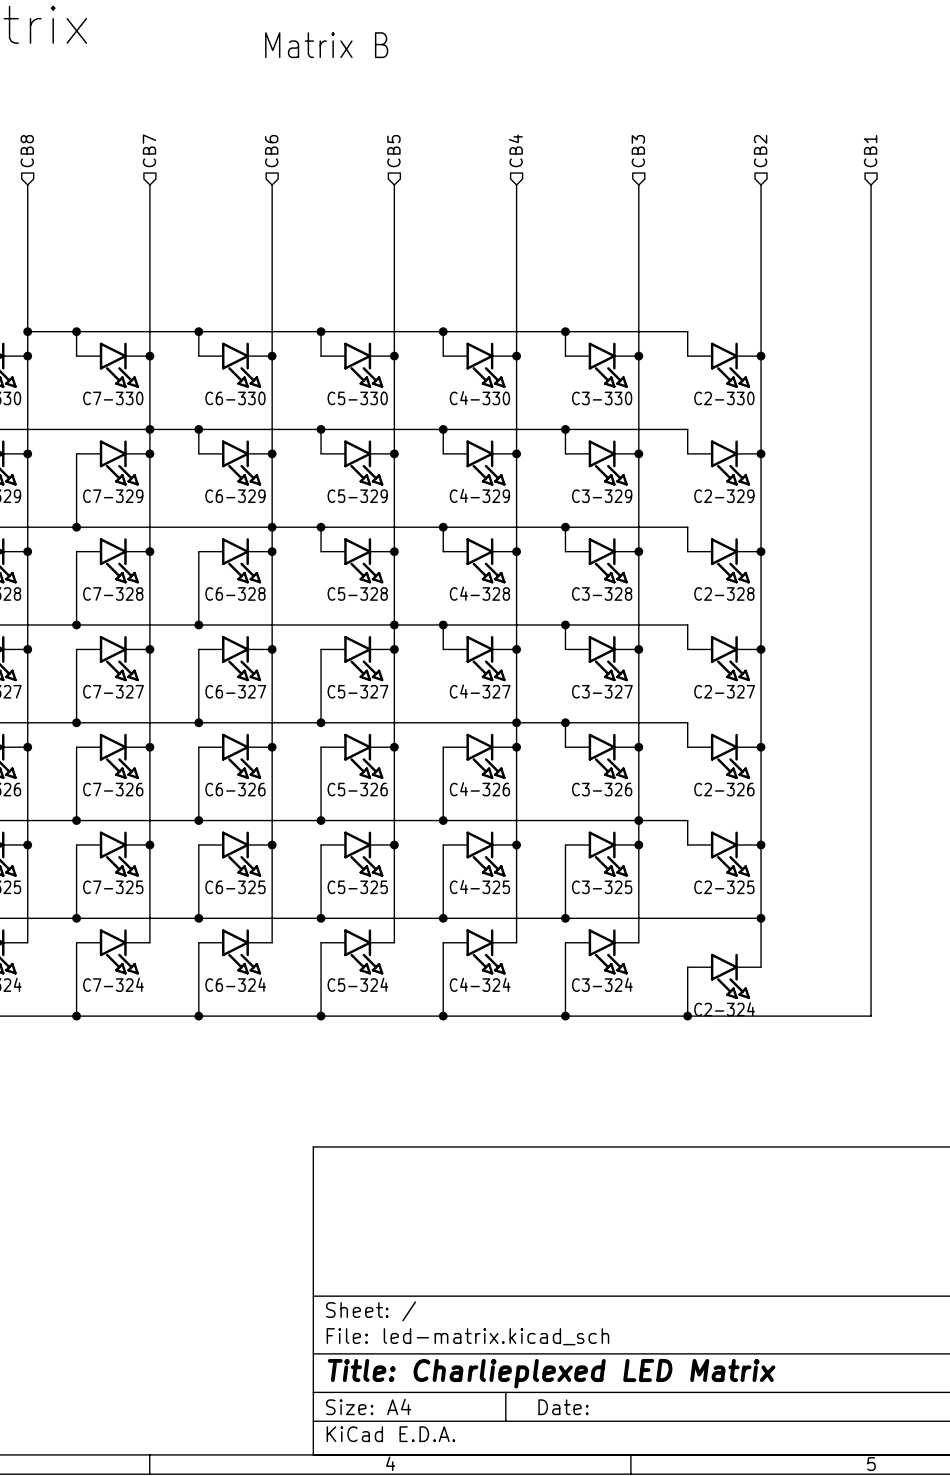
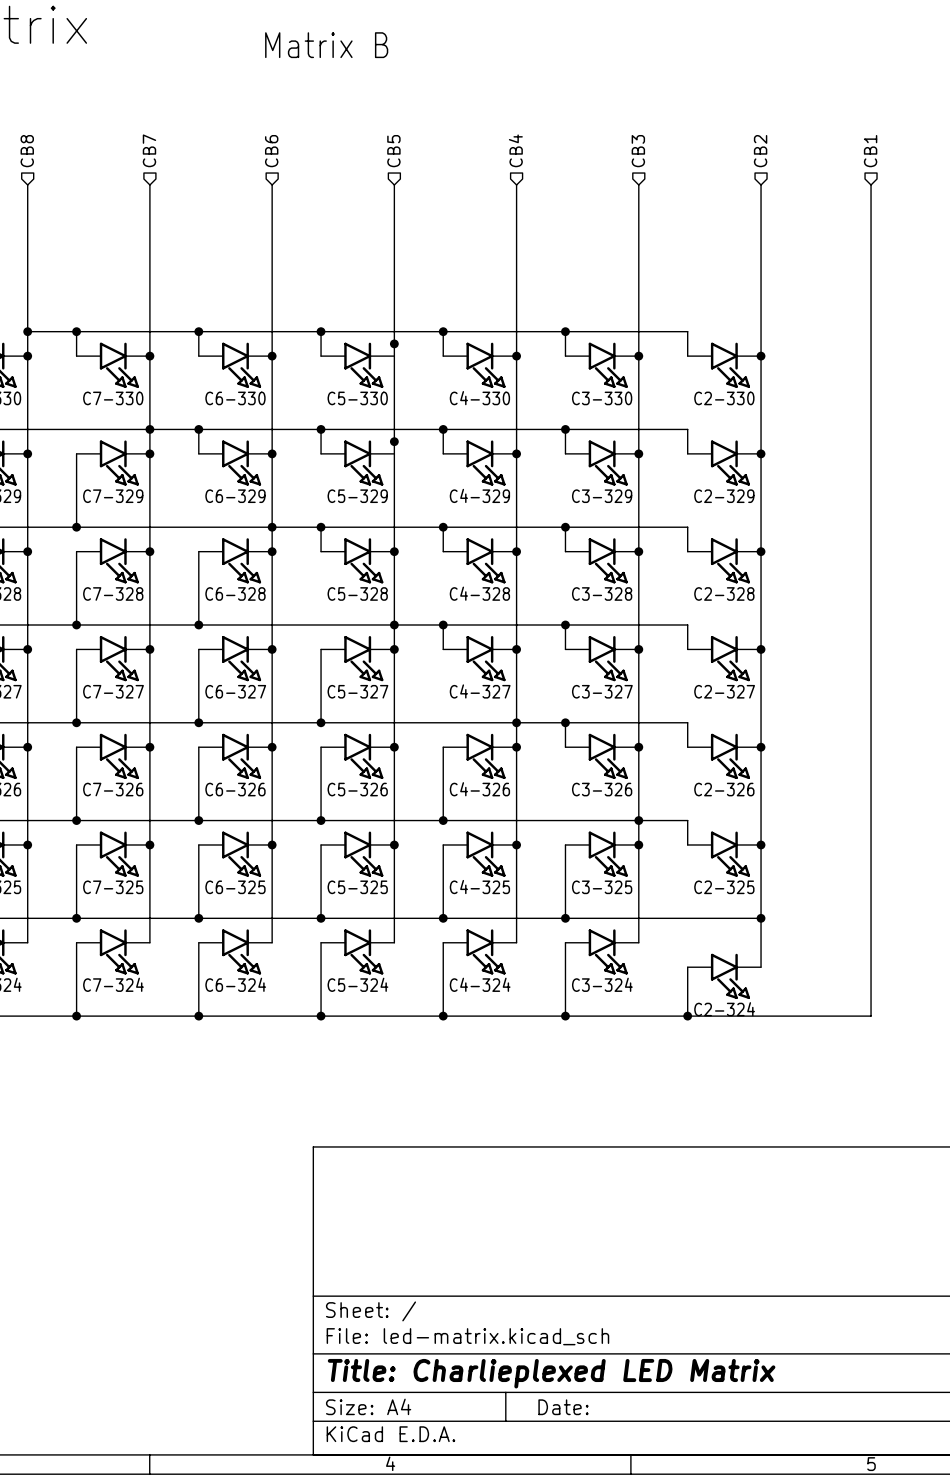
junction position: (394, 356) -> (394, 343)
junction position: (394, 453) -> (394, 441)

